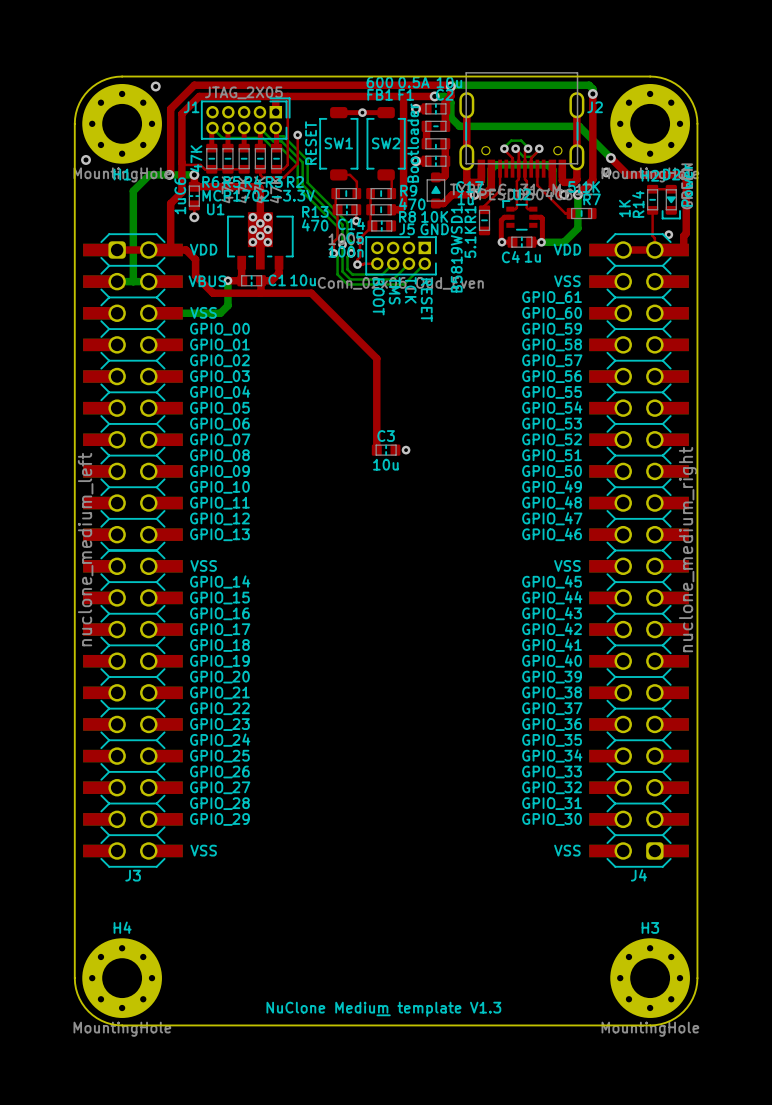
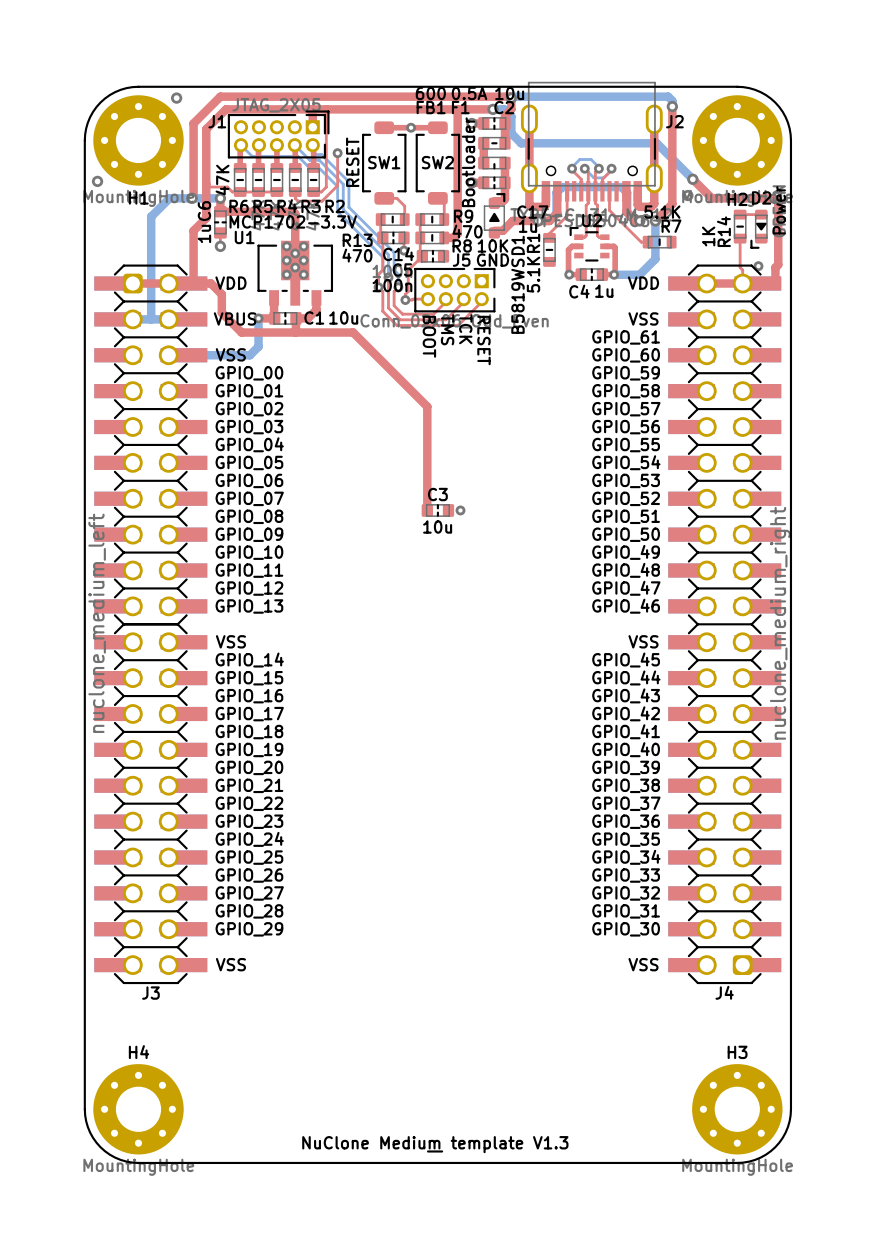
D1 footprint: [426, 172, 446, 209] -> [483, 193, 506, 239]
D2 footprint: [661, 184, 681, 220] -> [750, 209, 768, 249]
top track: none -> (388, 277) (388, 308) (400, 319) (445, 319) (463, 301)
bottom track: (342, 244) (342, 271) (350, 279) (393, 279) (408, 263) -> none
top track: none -> (378, 287) (382, 291) (382, 311) (396, 325) (458, 325) (481, 301)
bottom track: (333, 253) (337, 257) (337, 274) (347, 284) (404, 284) (424, 263) -> none
top track: none -> (398, 287) (394, 291) (394, 305) (402, 314) (433, 314) (445, 301)
bottom track: (351, 253) (347, 257) (347, 269) (352, 274) (382, 274) (393, 263) -> none

